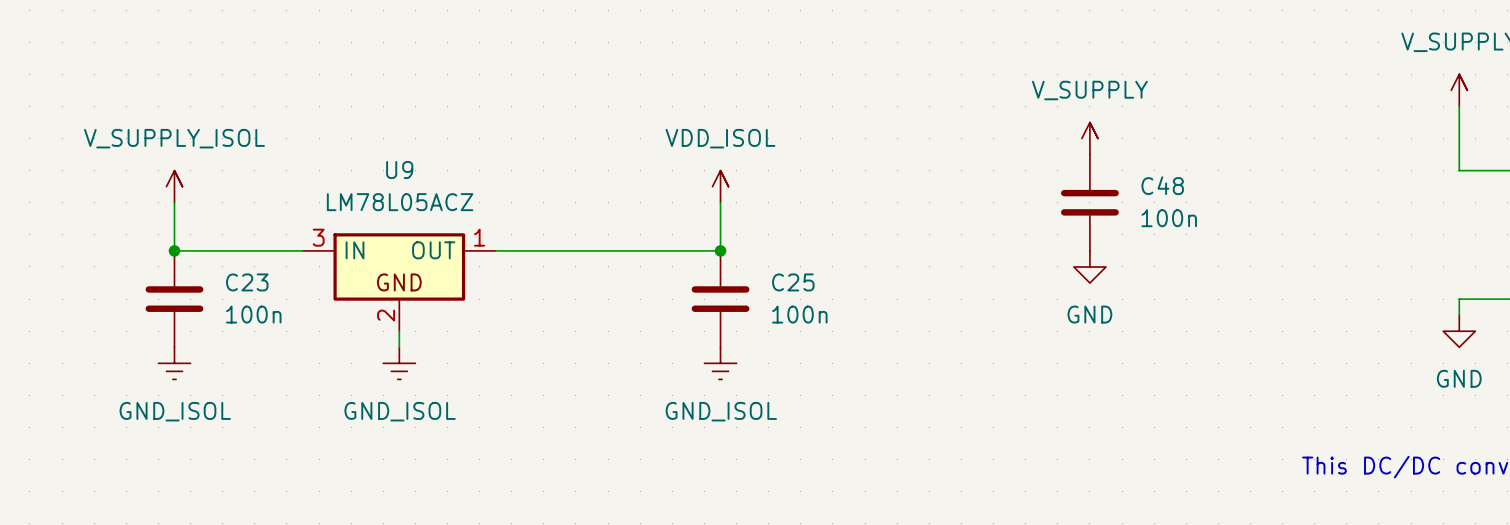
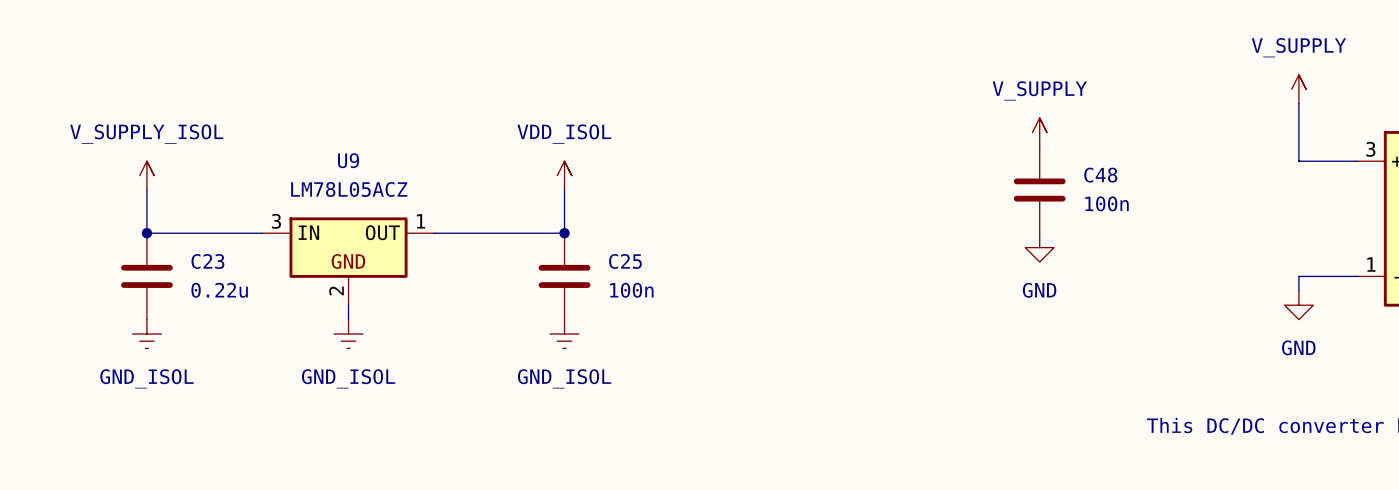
power symbol position: V_SUPPLY (1089, 138) -> V_SUPPLY (1039, 132)
power symbol position: VDD_ISOL (720, 186) -> VDD_ISOL (564, 175)
wire: (720, 202) (720, 250) (640, 250) -> (564, 190) (564, 233)
C48 position: (1089, 202) -> (1039, 190)
junction: none -> (564, 233)
junction: (720, 250) -> none
power symbol position: GND (1089, 266) -> GND (1039, 247)
C25 position: (720, 299) -> (564, 276)
C23 value: 100n (253, 314) -> 0.22u (219, 290)
power symbol position: GND_ISOL (720, 363) -> GND_ISOL (564, 334)

